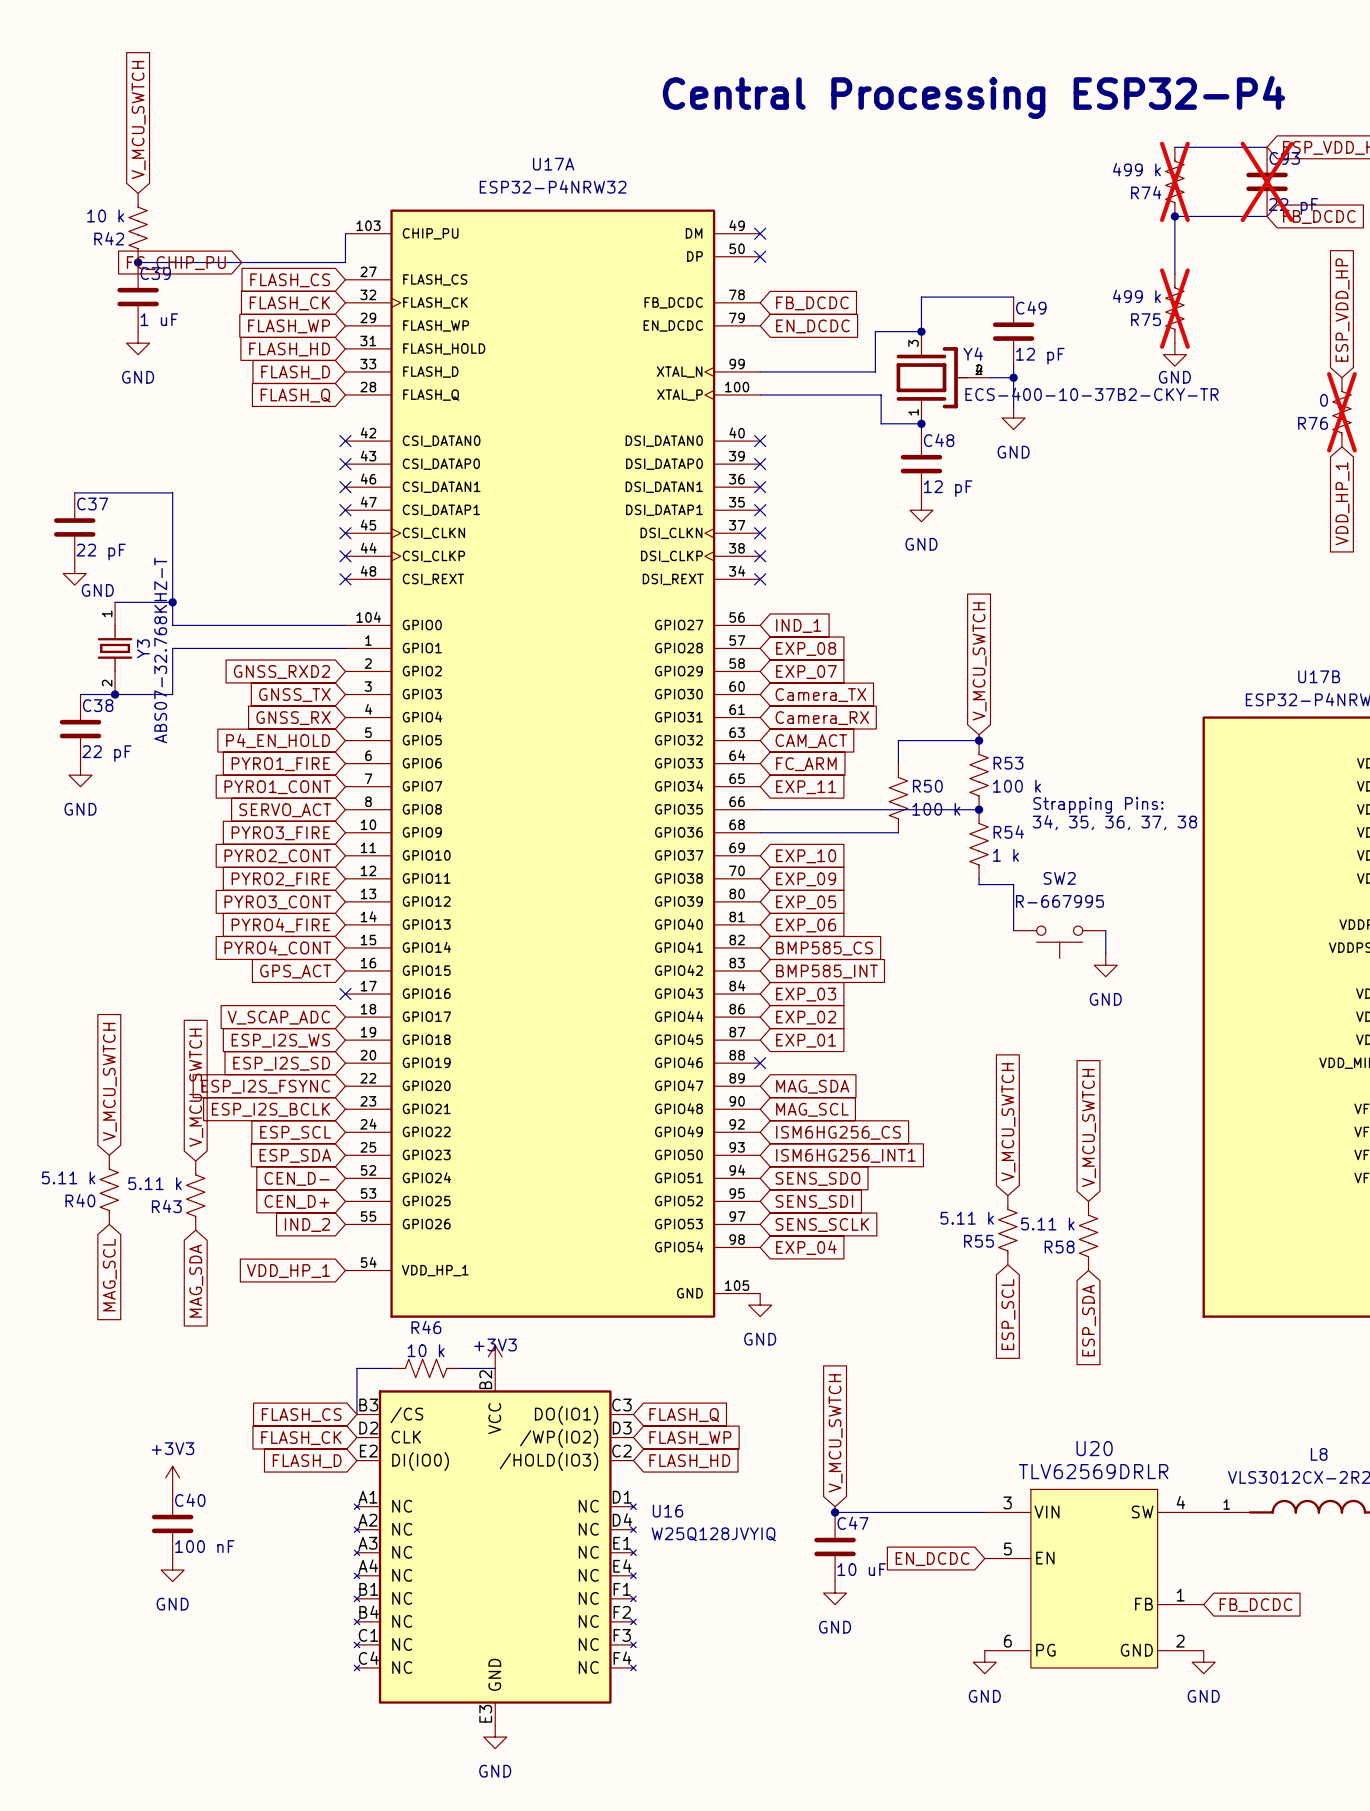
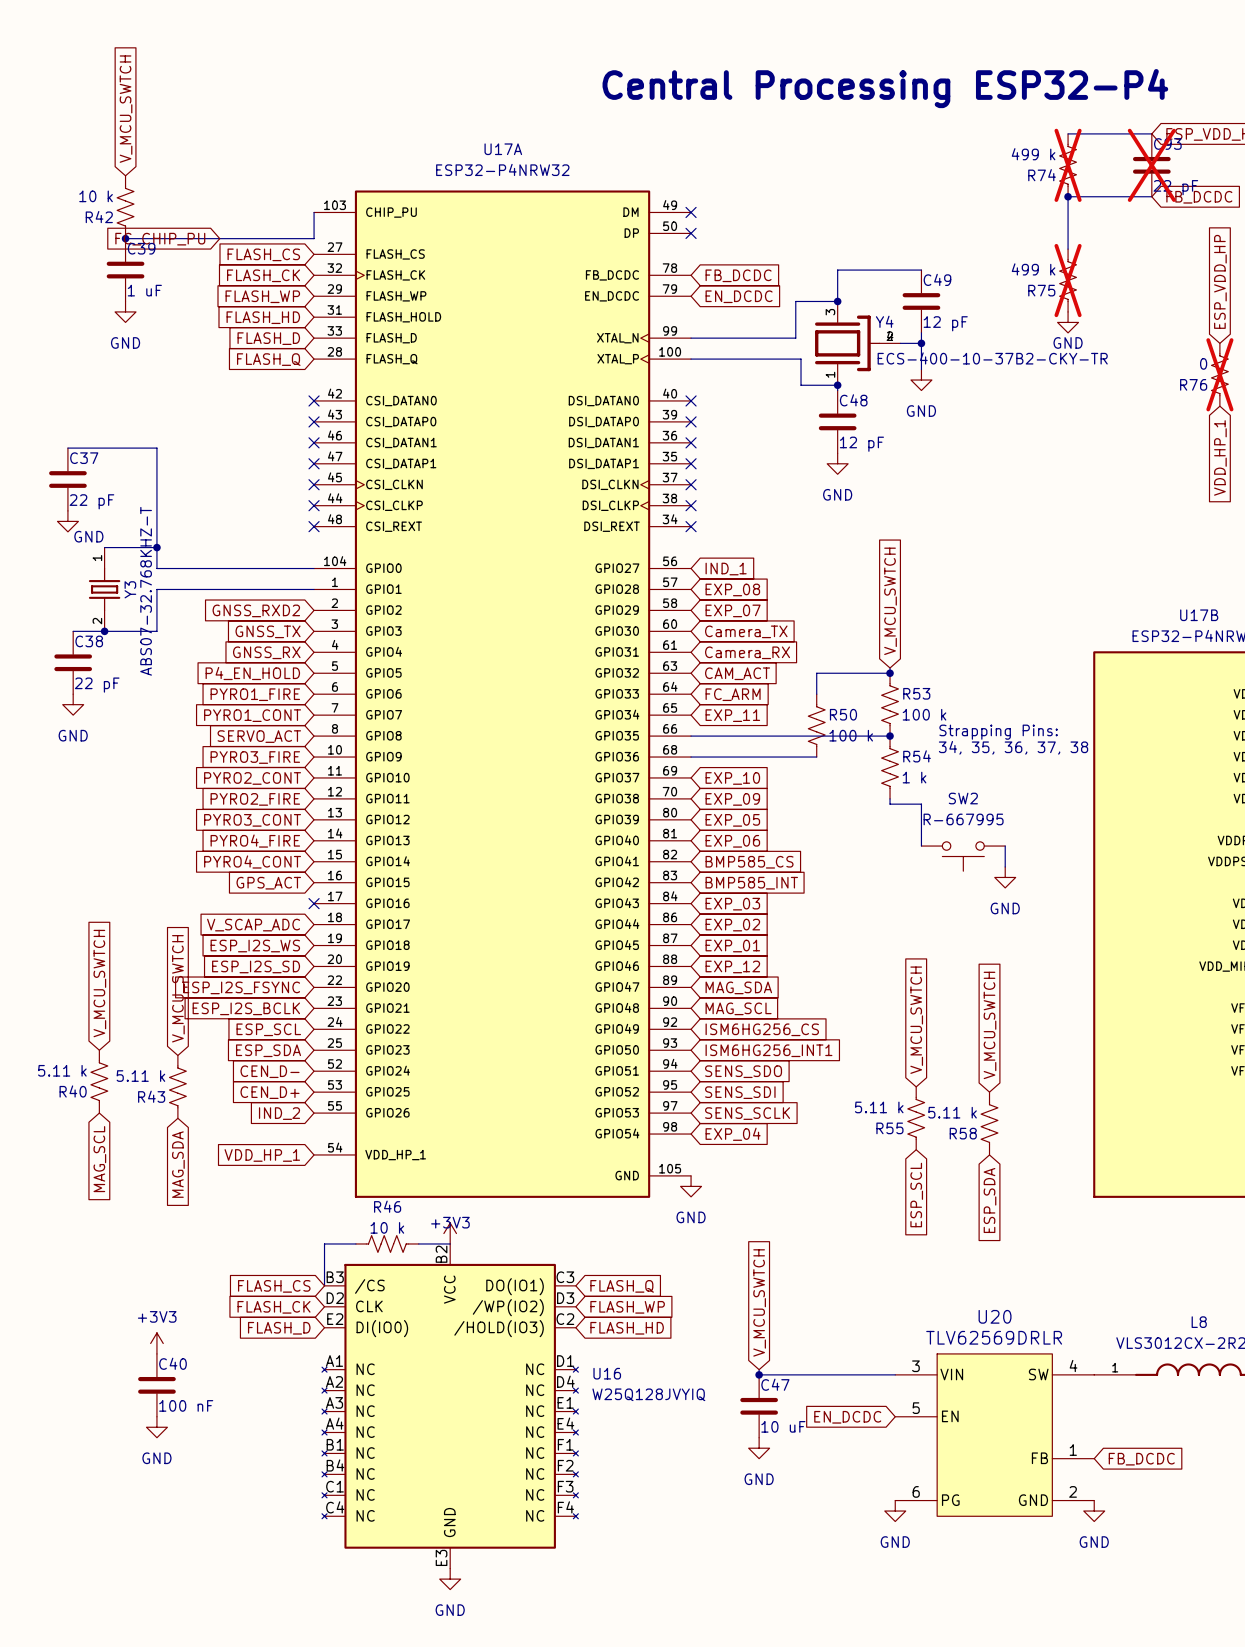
no-connect mark: (760, 1063) -> none
global label: none -> EXP_12 (732, 966)

